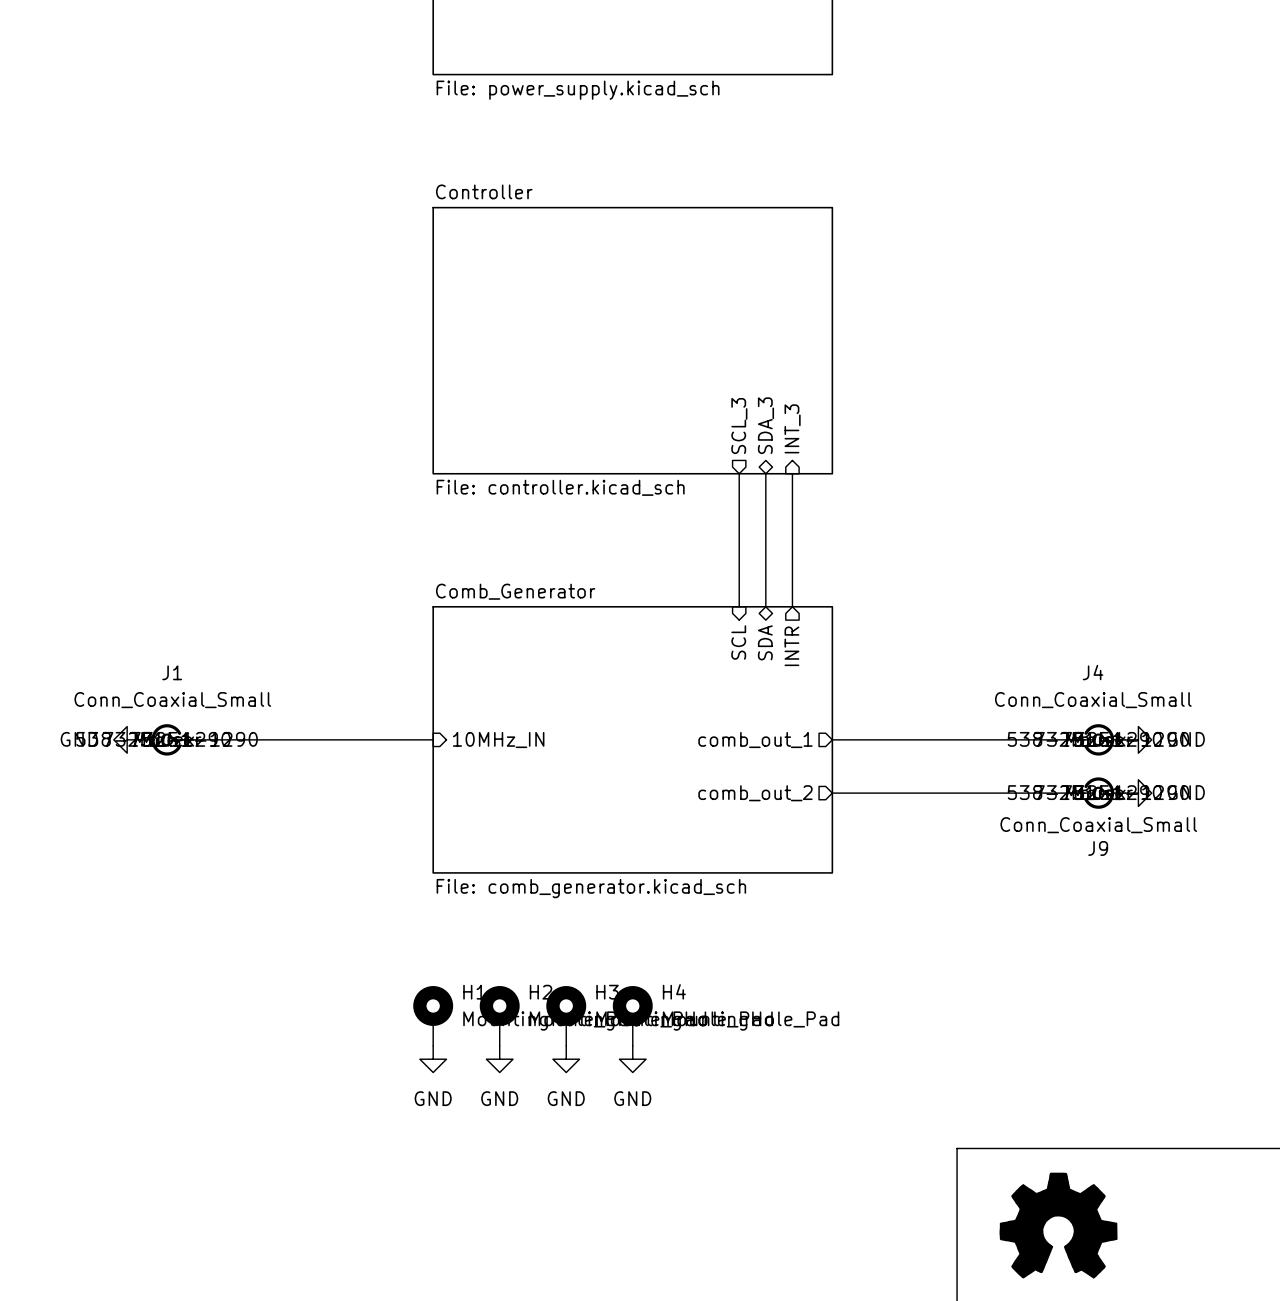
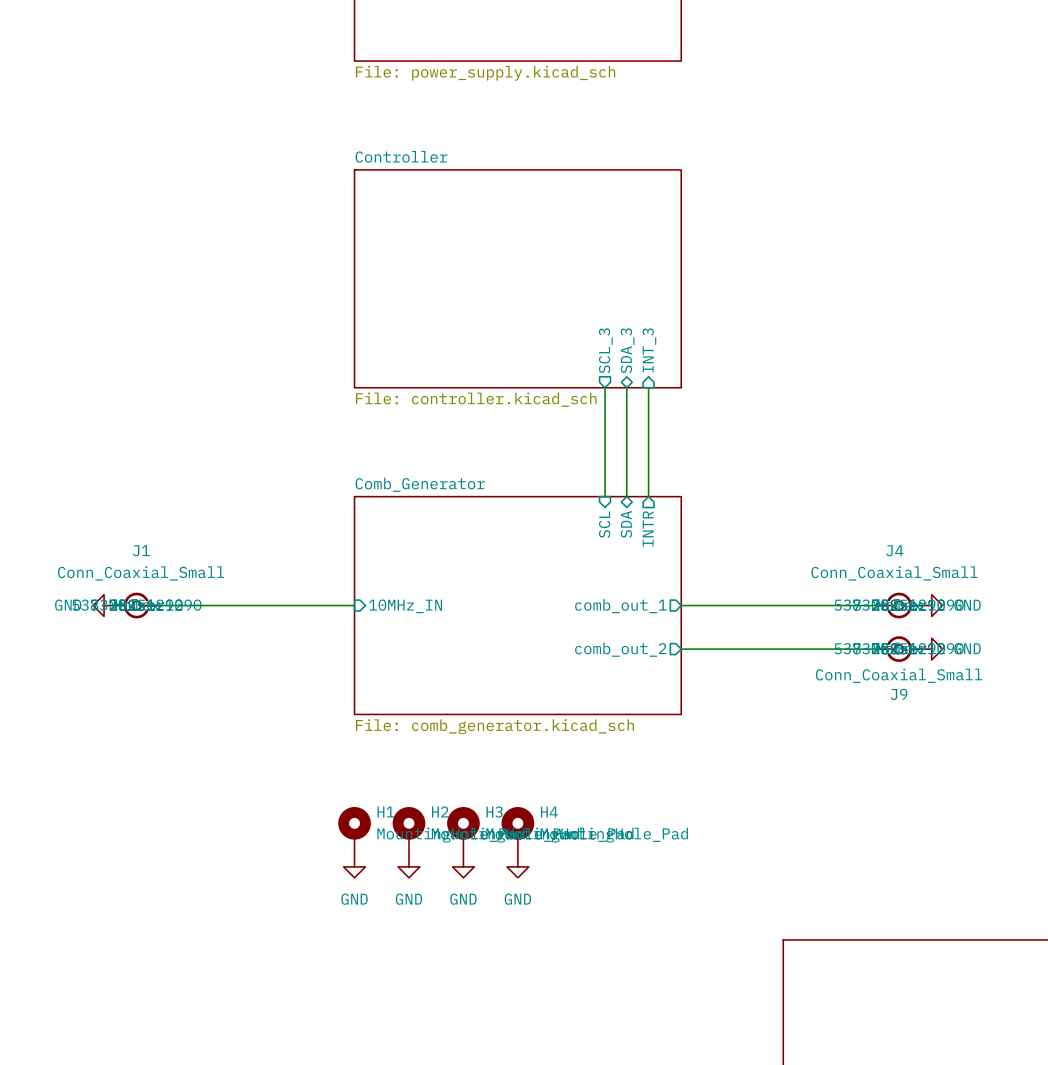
power symbol: (1058, 1225) -> none

